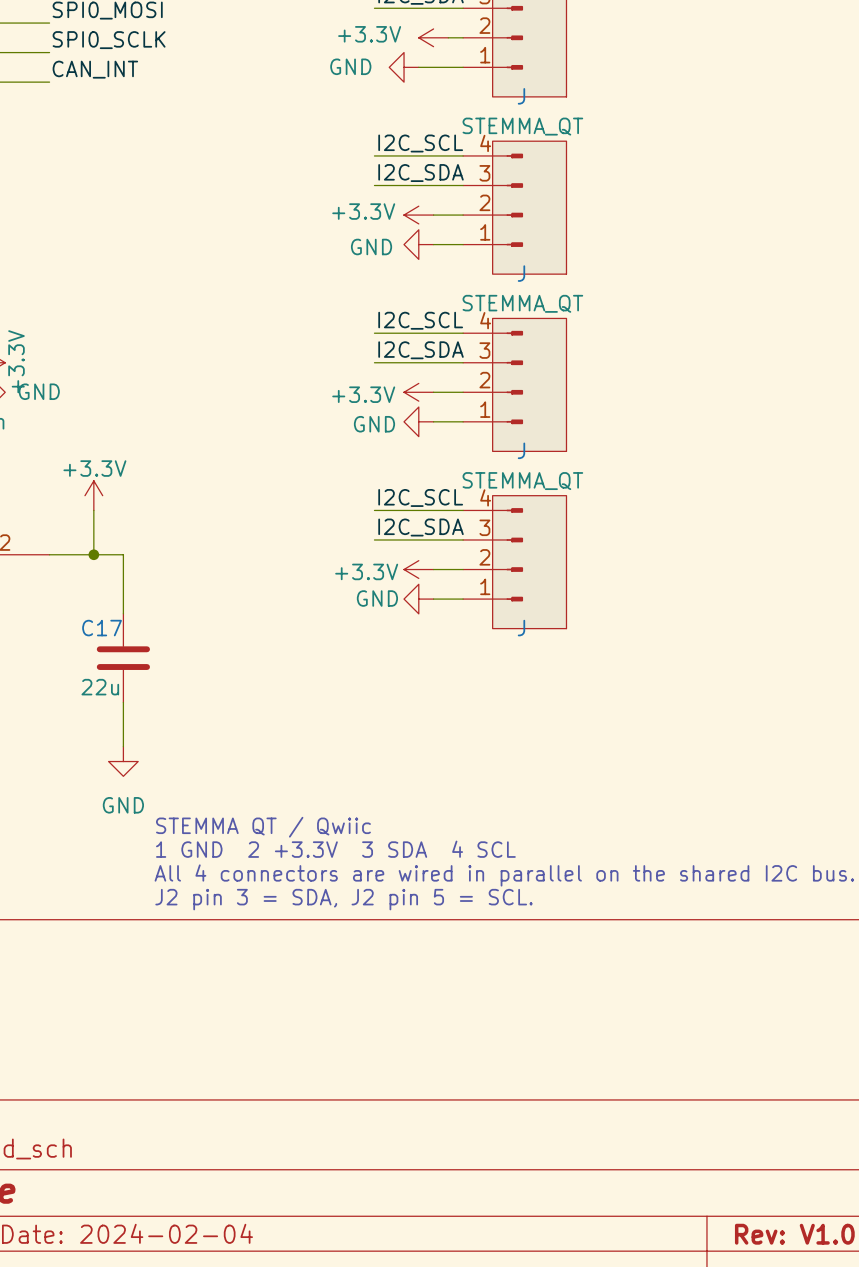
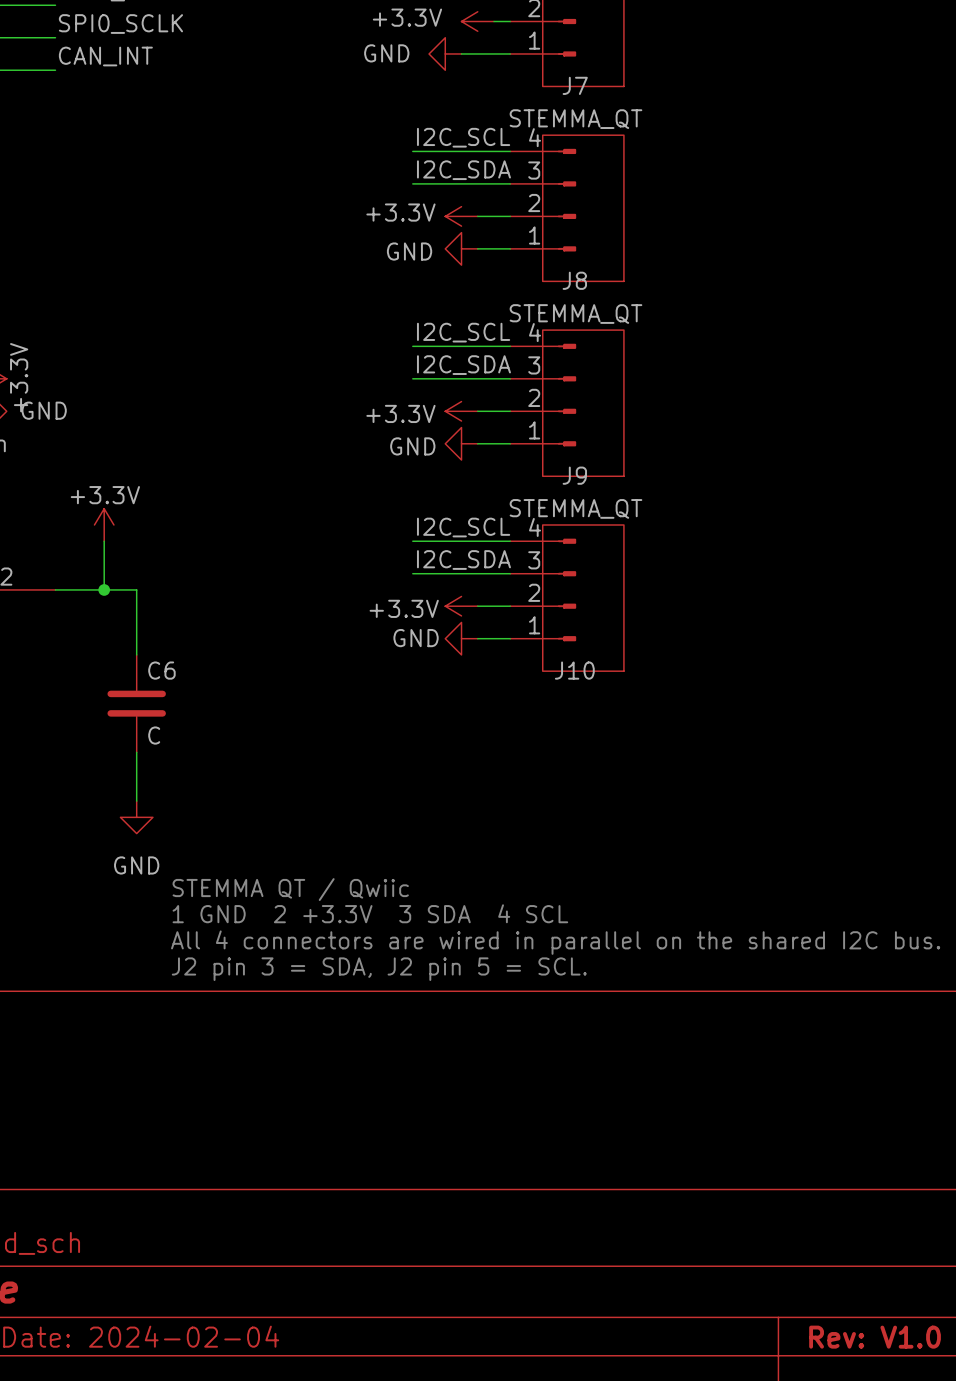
J name: J (521, 96) -> J7 (575, 85)
J name: J (521, 273) -> J8 (574, 280)
J name: J (521, 450) -> J9 (574, 475)
C17 name: C17 (102, 628) -> C6 (161, 670)
J name: J (521, 628) -> J10 (574, 670)
C17 value: 22u (100, 687) -> C (154, 735)

